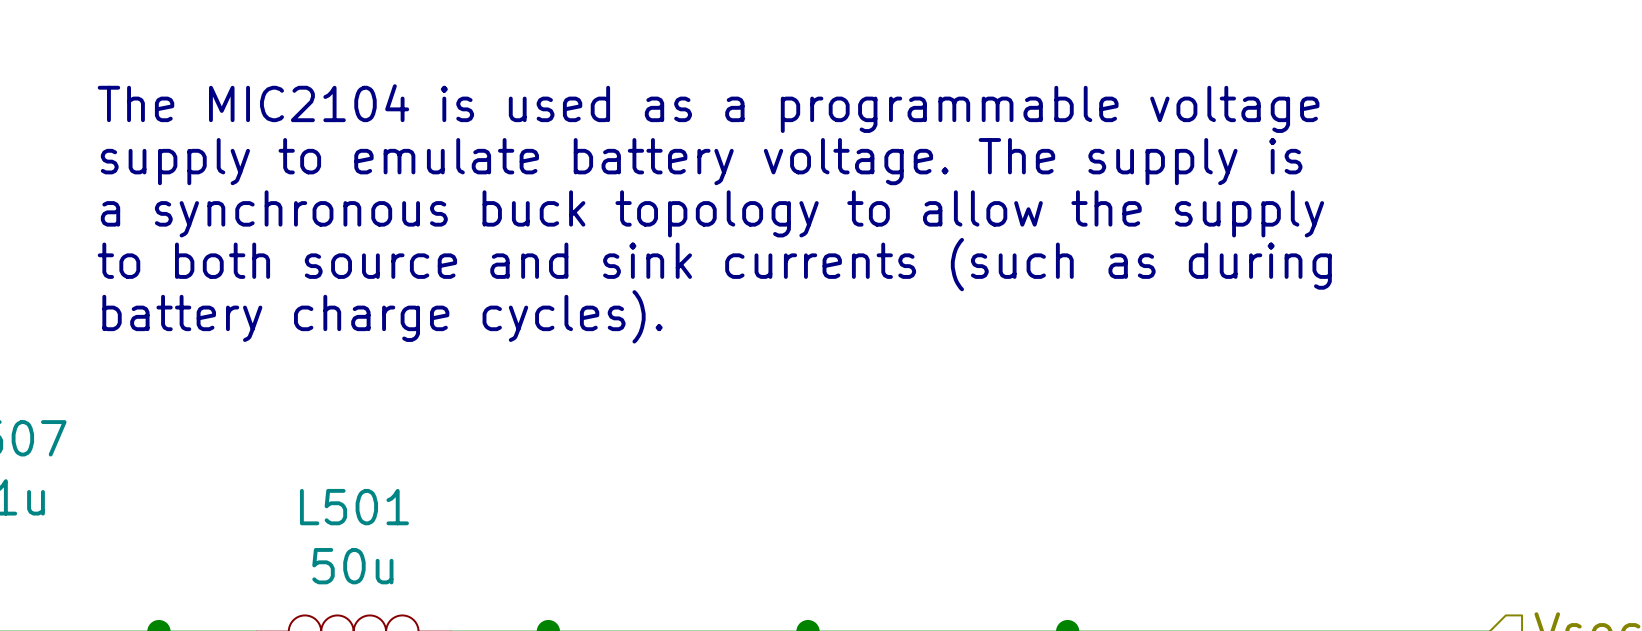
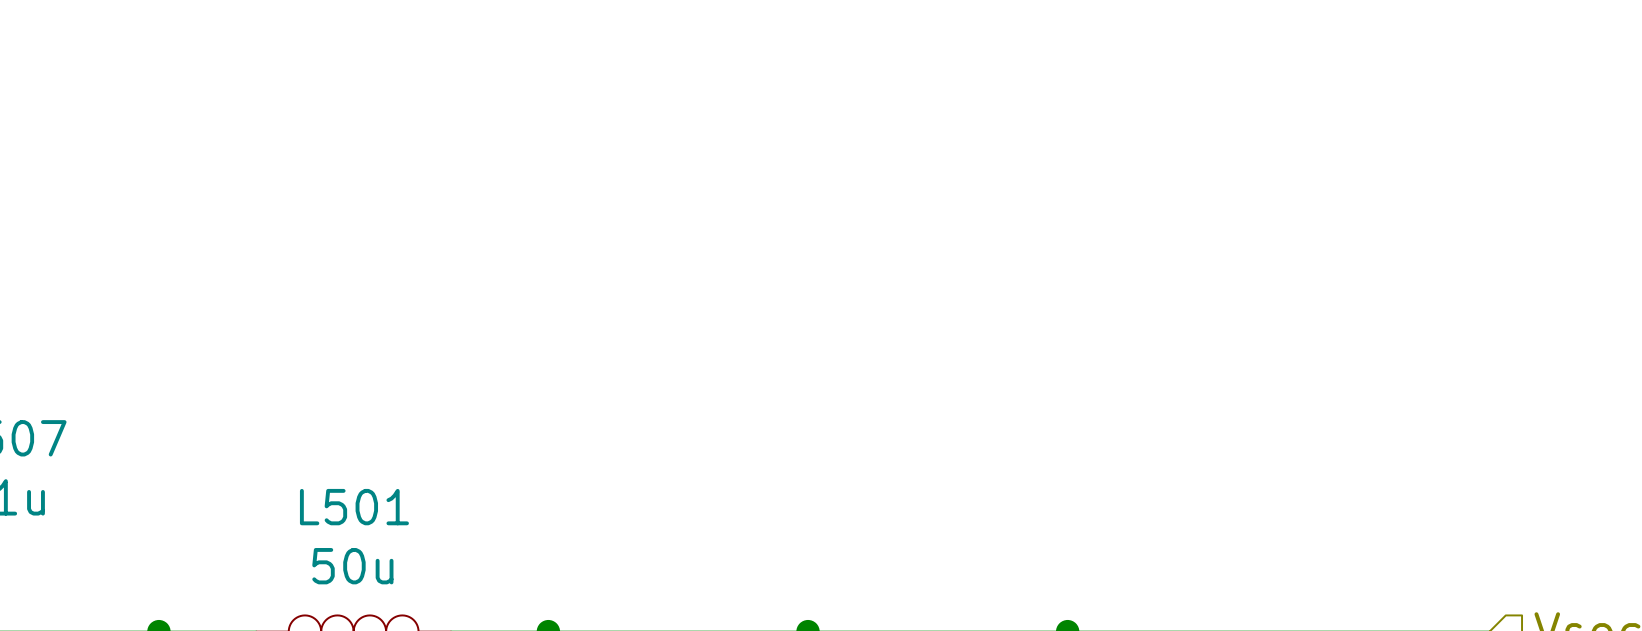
text: The MIC2104 is used as a programmable voltage (708, 108) -> none
text: supply to emulate battery voltage. The supply is (701, 161) -> none
text: a synchronous buck topology to allow the supply (712, 213) -> none
text: to both source and sink currents (such as during (714, 264) -> none
text: battery charge cycles). (382, 316) -> none

